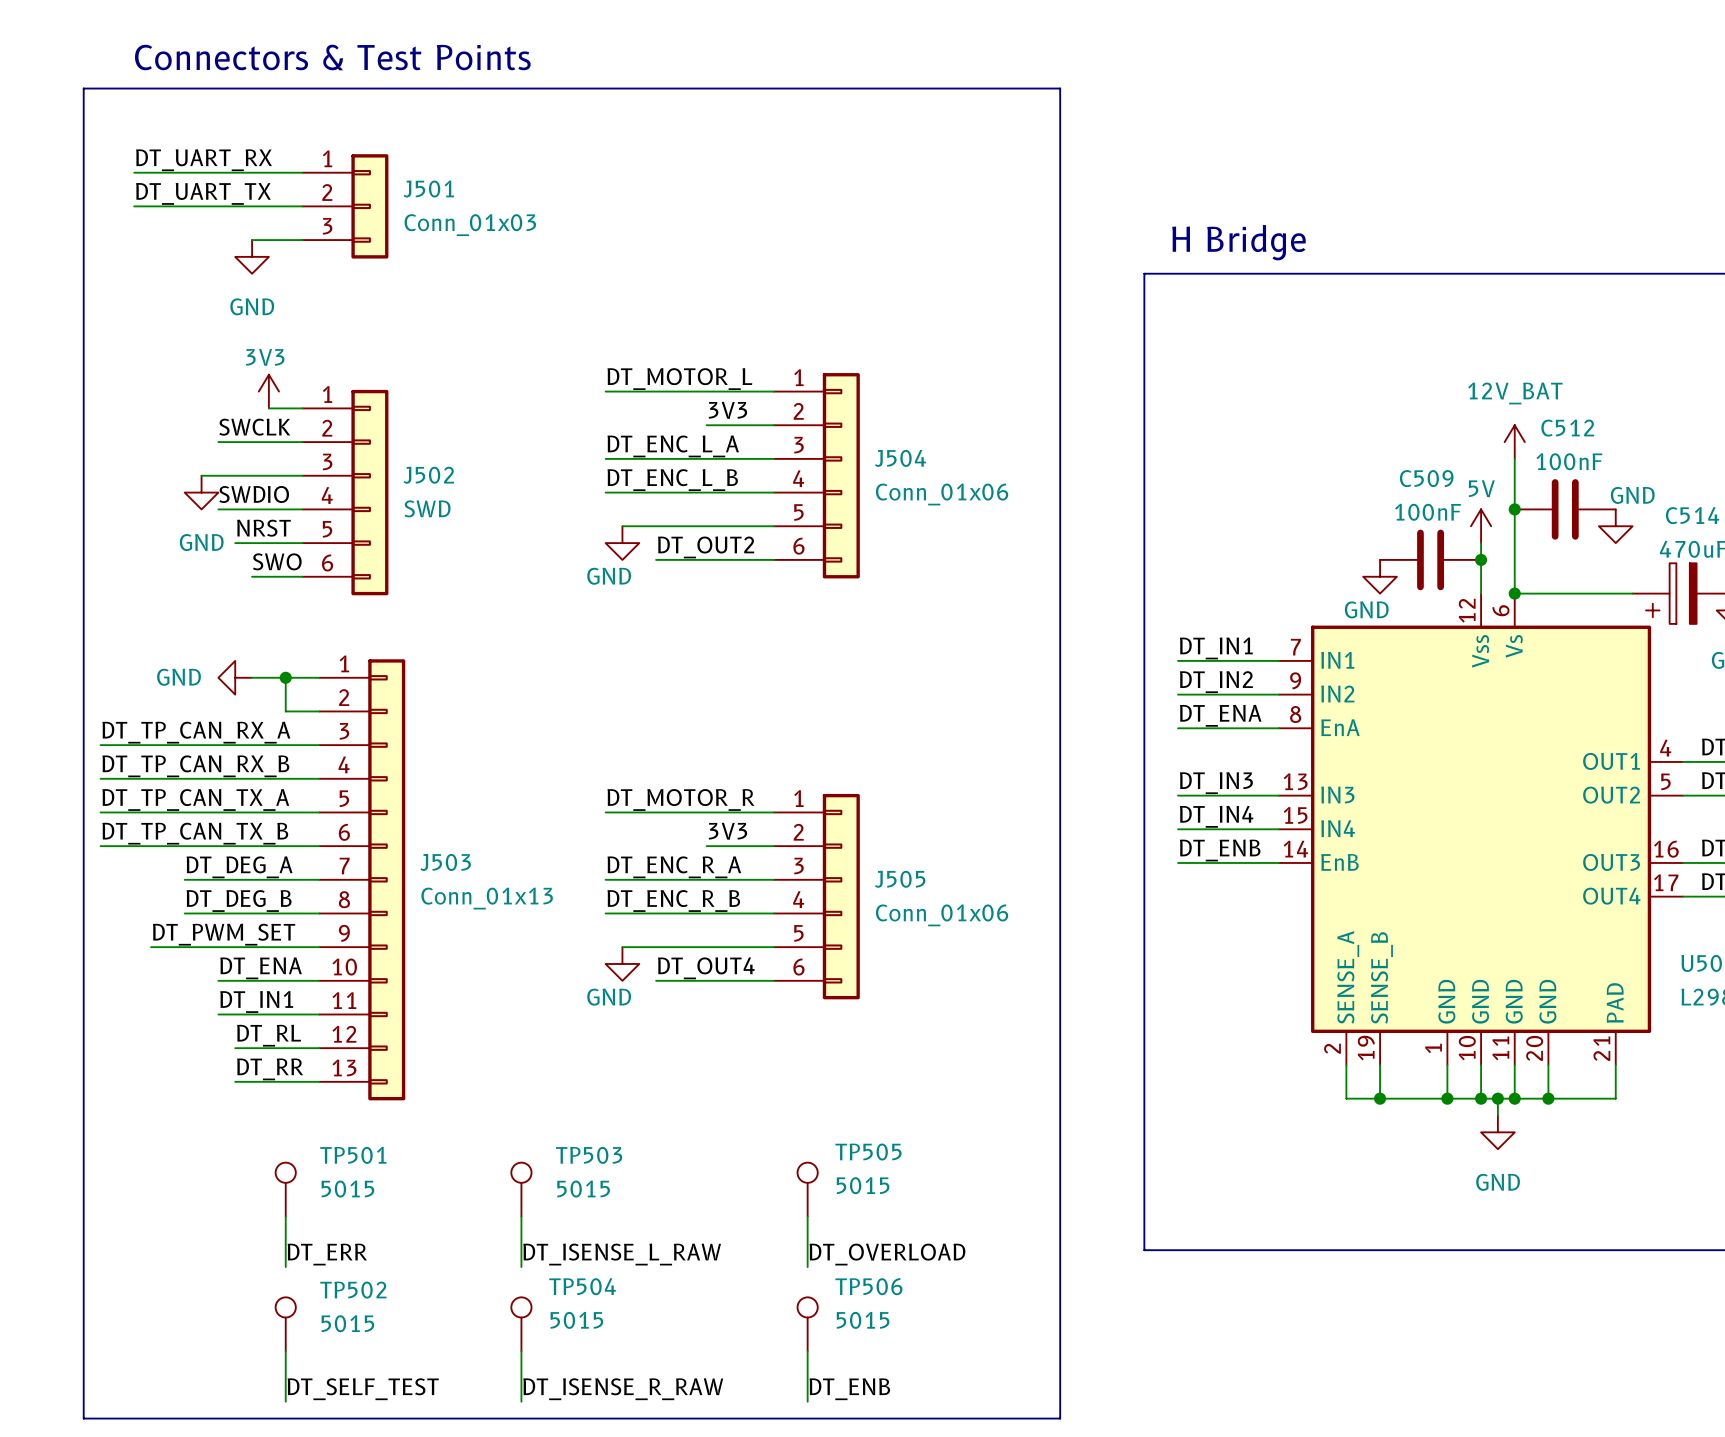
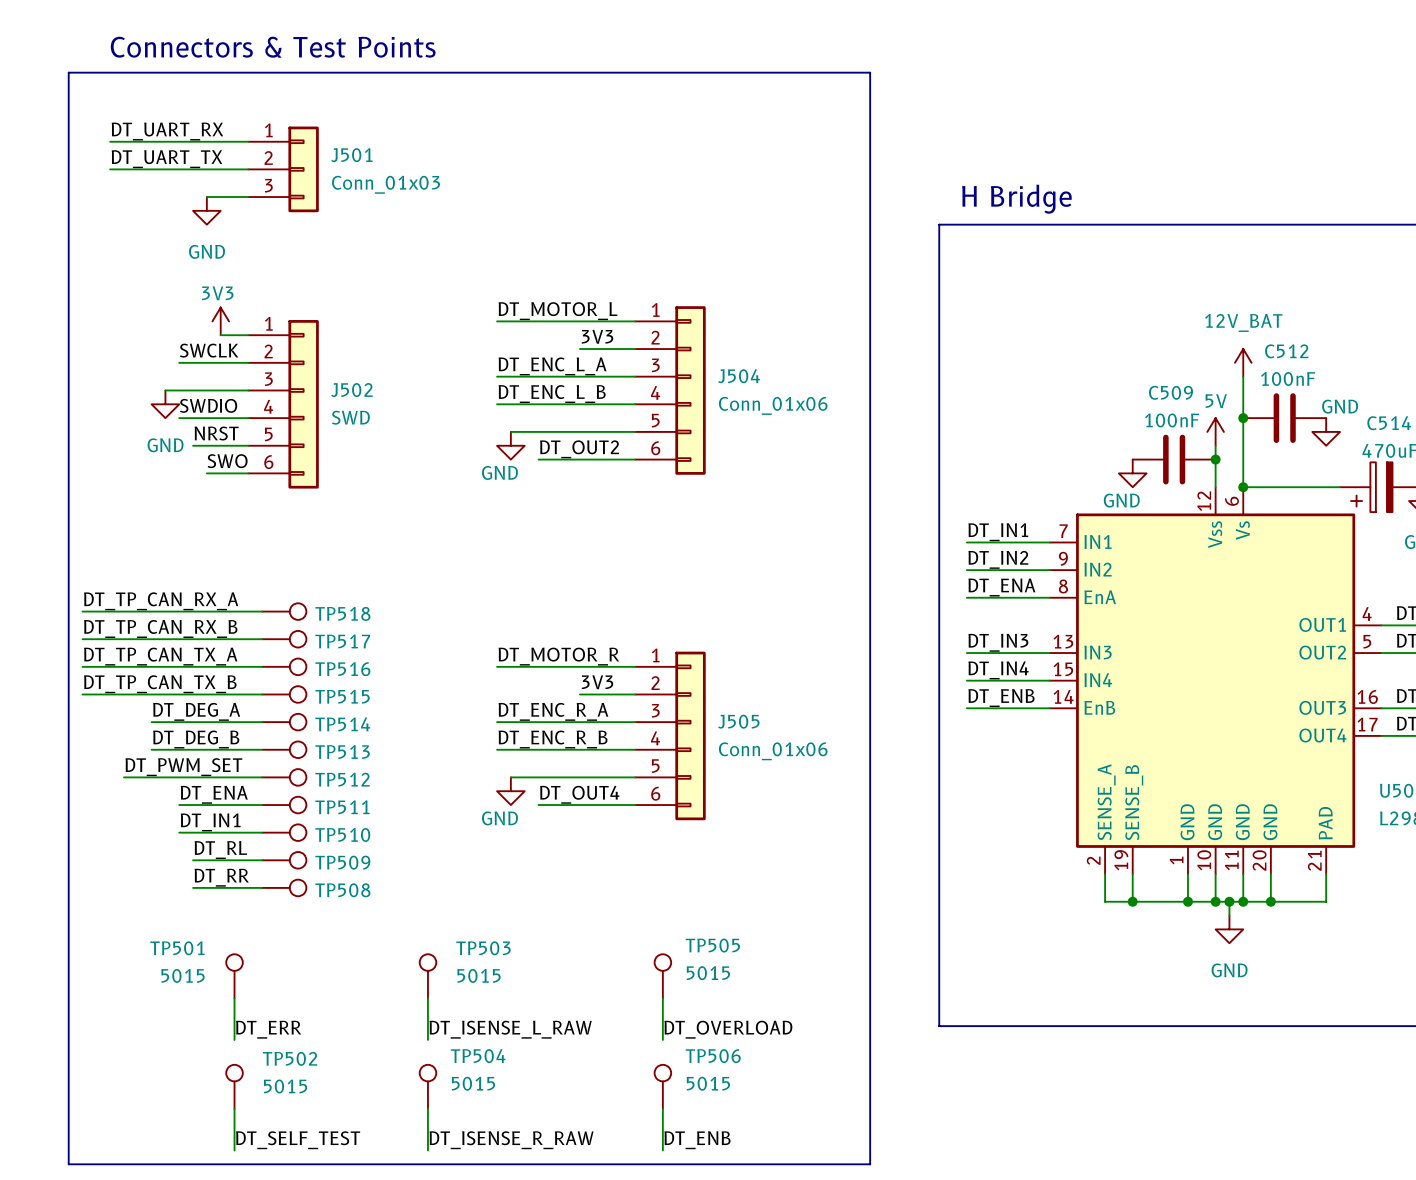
power symbol: GND (235, 677) -> none
wire: (252, 677) (319, 677) -> none
wire: (285, 677) (285, 711) (319, 711) -> none
junction: (285, 677) -> none
TP518: none -> (284, 611)
TP517: none -> (284, 639)
TP516: none -> (284, 666)
TP515: none -> (284, 694)
TP514: none -> (284, 722)
J503: Conn_01x13 (362, 879) -> none
TP513: none -> (284, 749)
TP512: none -> (284, 777)
TP511: none -> (284, 805)
TP510: none -> (284, 832)
TP509: none -> (284, 860)
TP508: none -> (284, 887)
TP501 name position: TP501 (353, 1155) -> TP501 (177, 948)
TP501 value position: 5015 (347, 1189) -> 5015 (183, 975)

